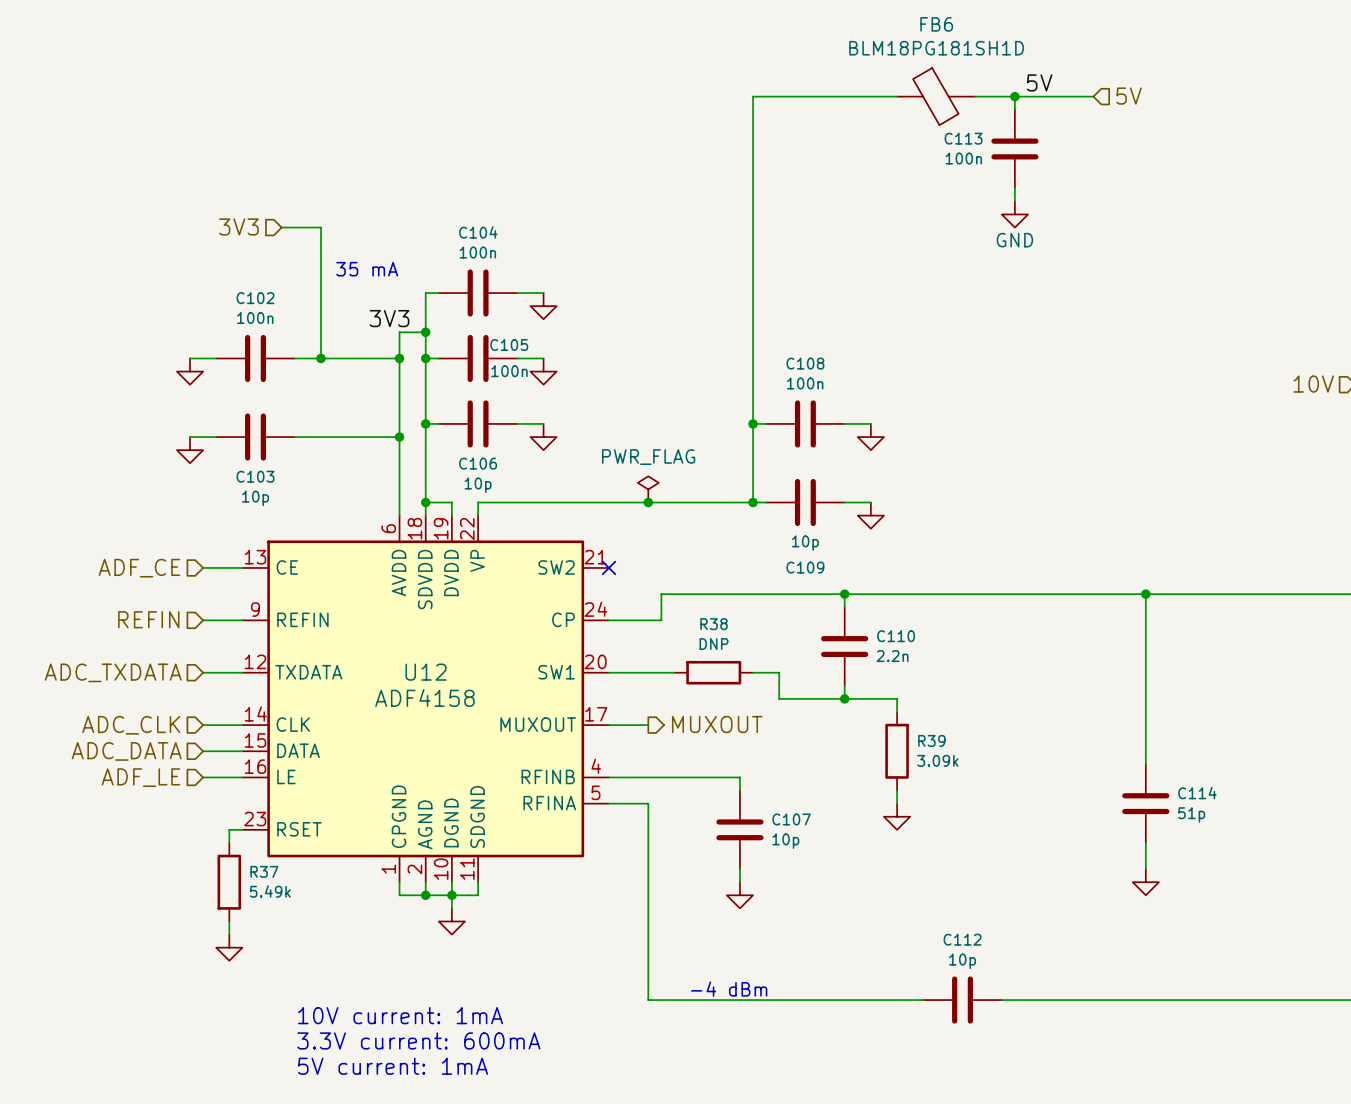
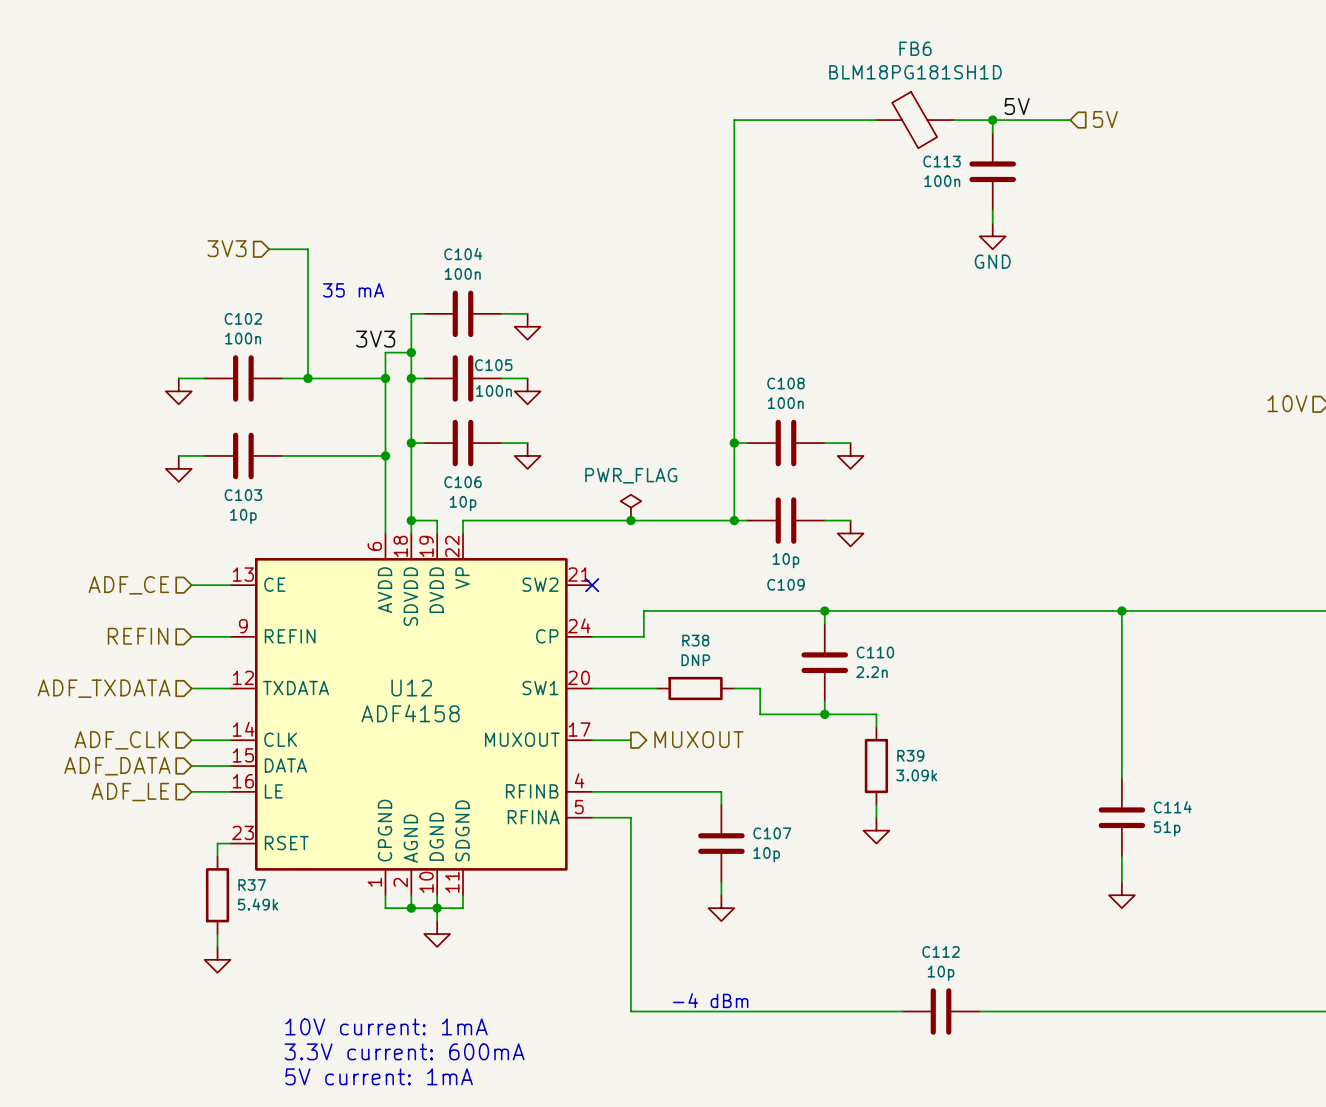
hierarchical label: ADC_TXDATA (113, 672) -> ADF_TXDATA (104, 688)
hierarchical label: ADC_CLK (131, 725) -> ADF_CLK (121, 740)
hierarchical label: ADC_DATA (126, 751) -> ADF_DATA (117, 766)

